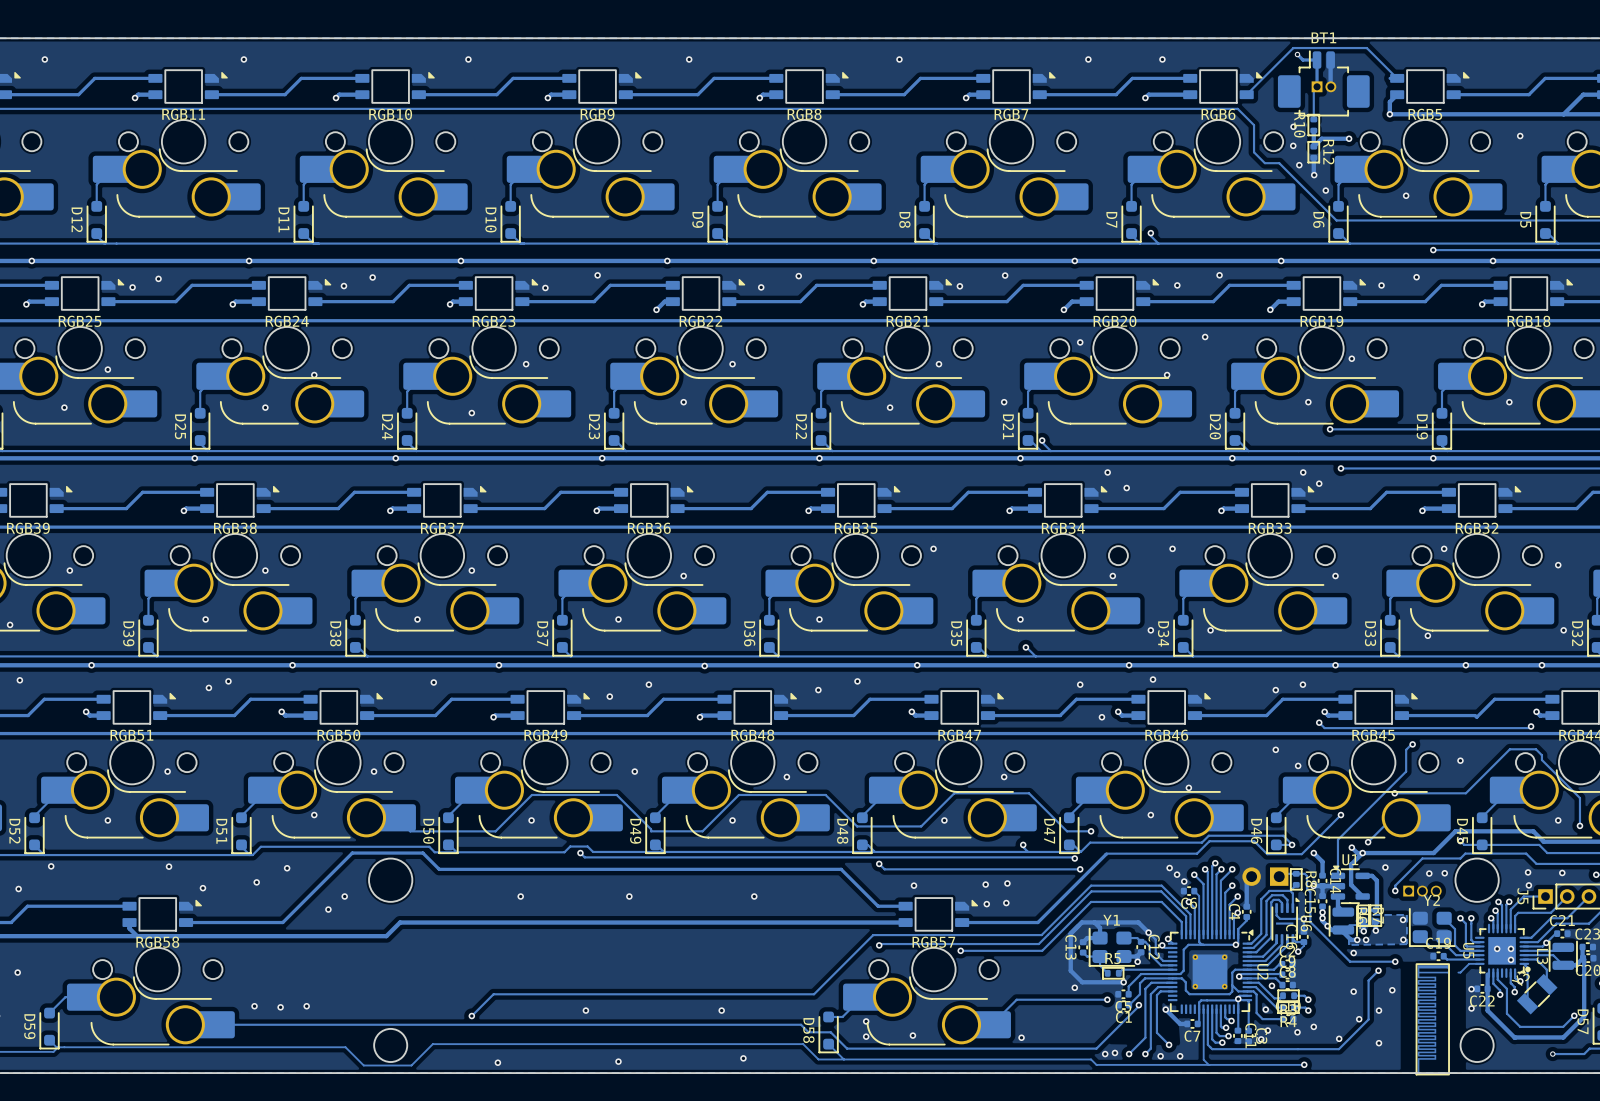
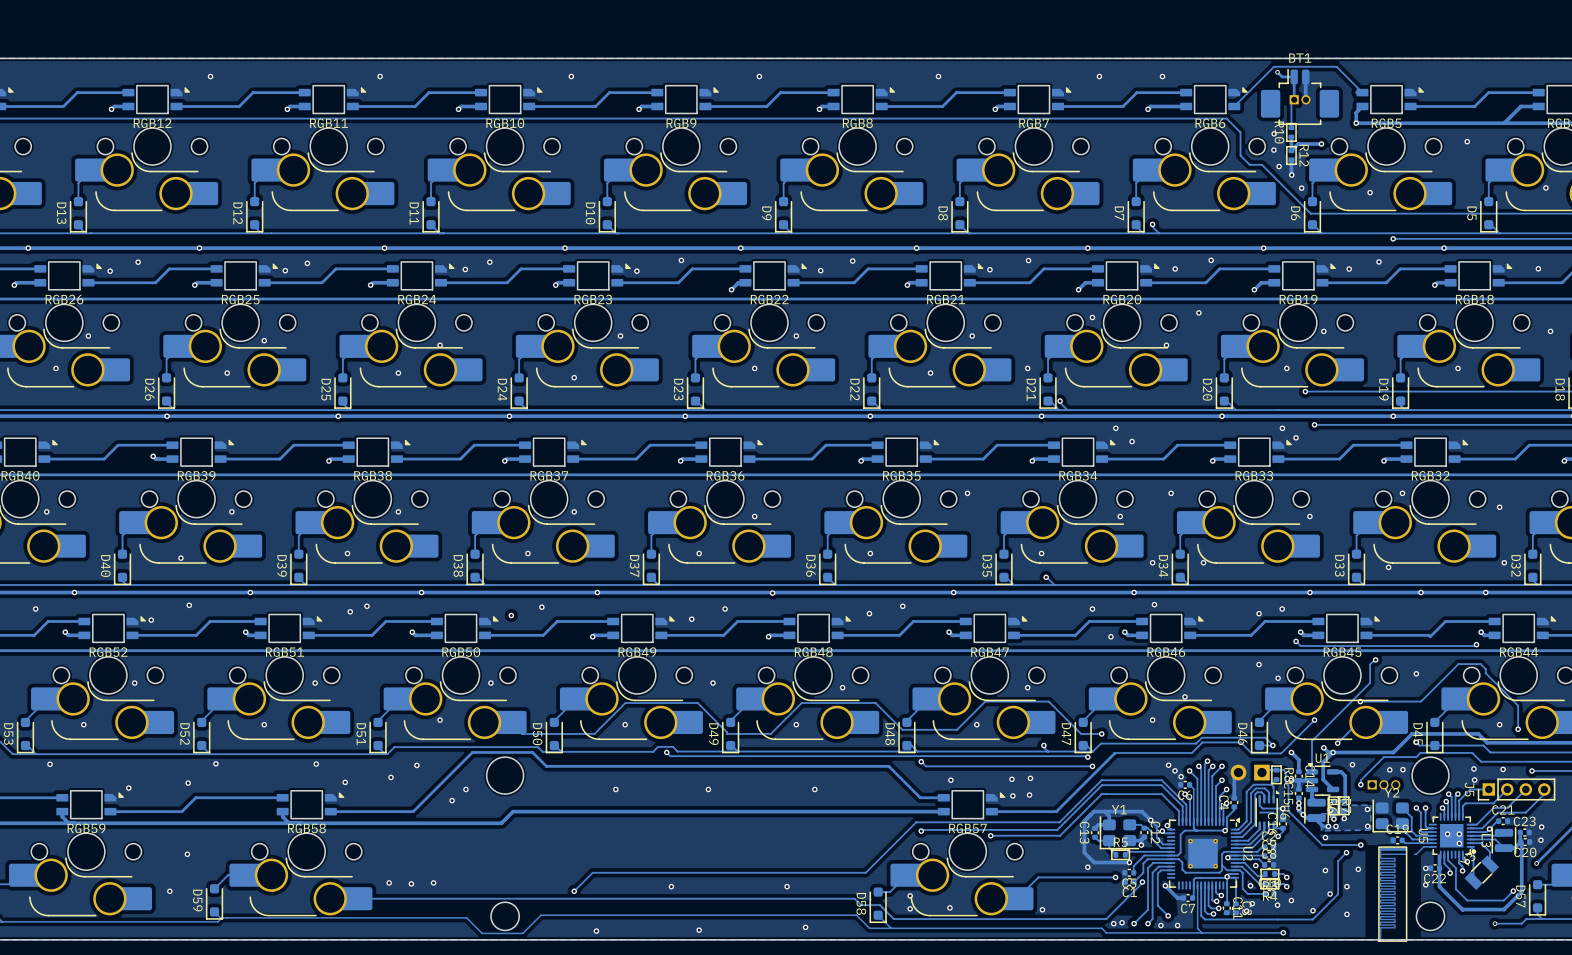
via: none -> (511, 615)

